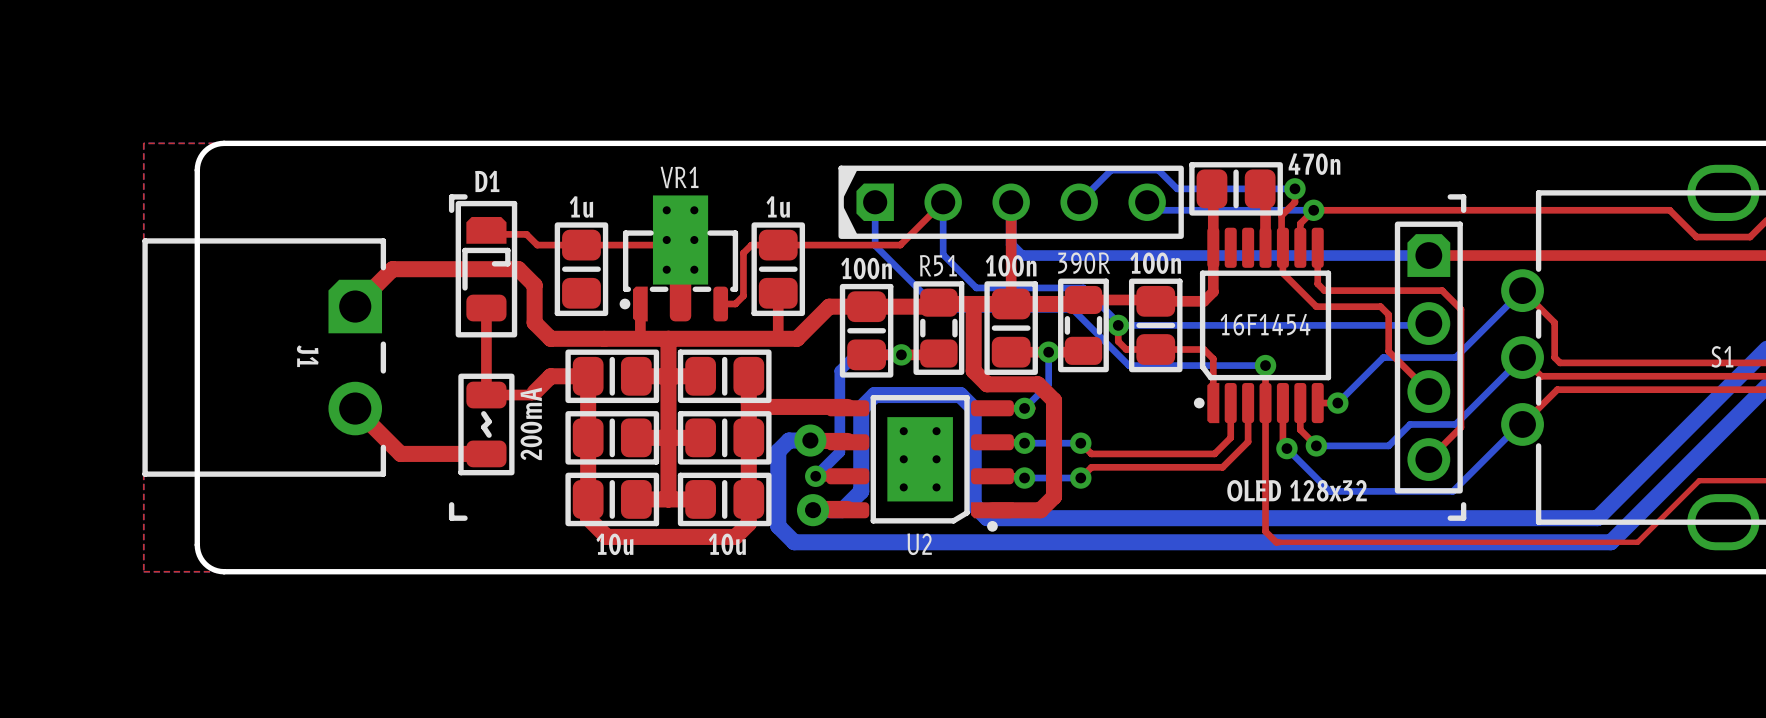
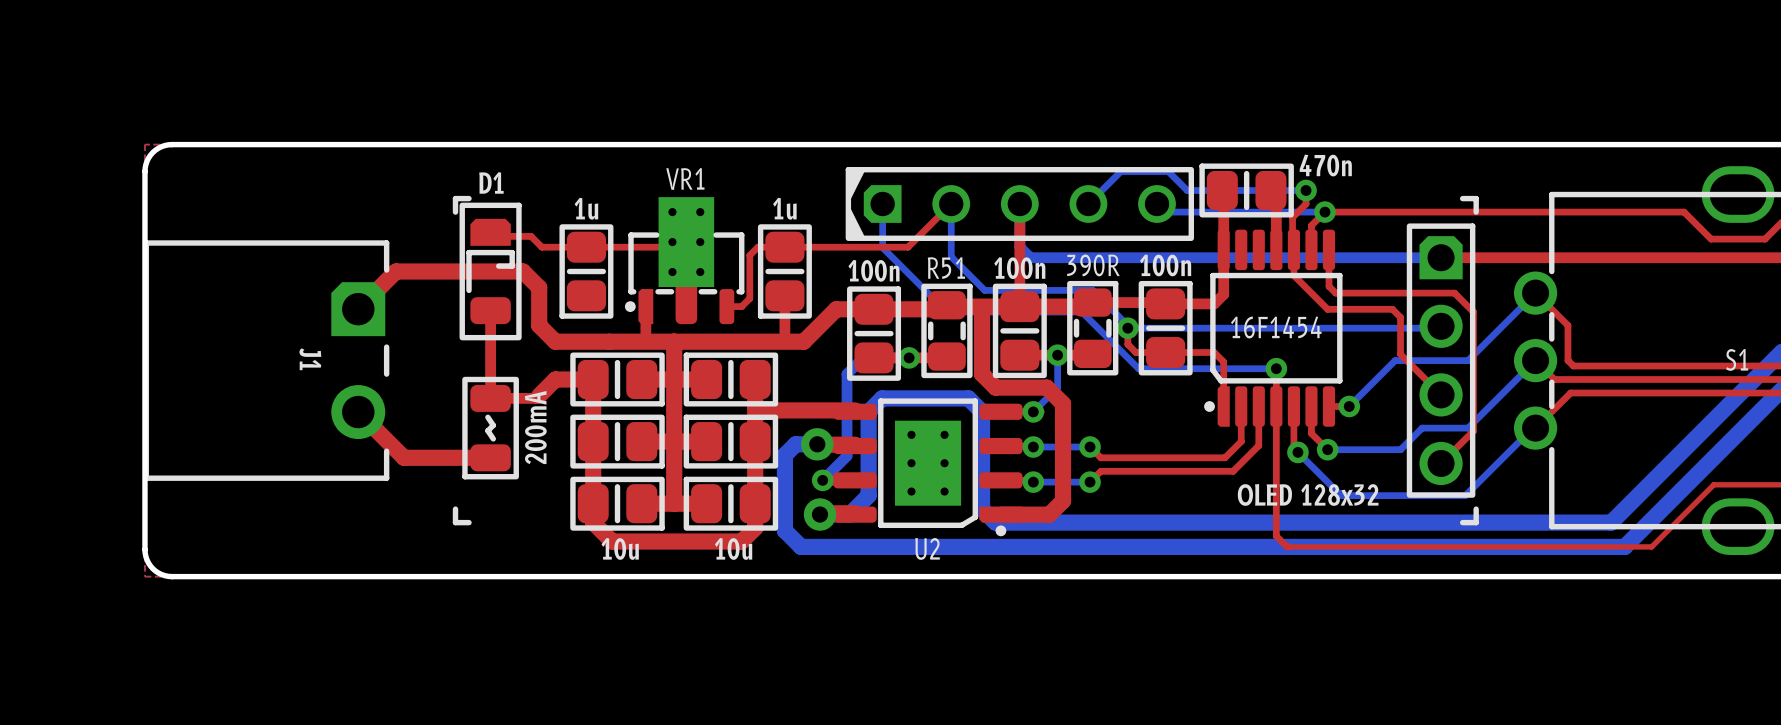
board edge: (224, 143) (213, 145) (205, 151) (199, 159) (197, 170) (197, 548) (200, 558) (207, 566) (224, 571) -> (225, 144) (164, 145) (150, 155) (144, 171) (145, 556) (152, 568) (164, 575) (225, 576)

